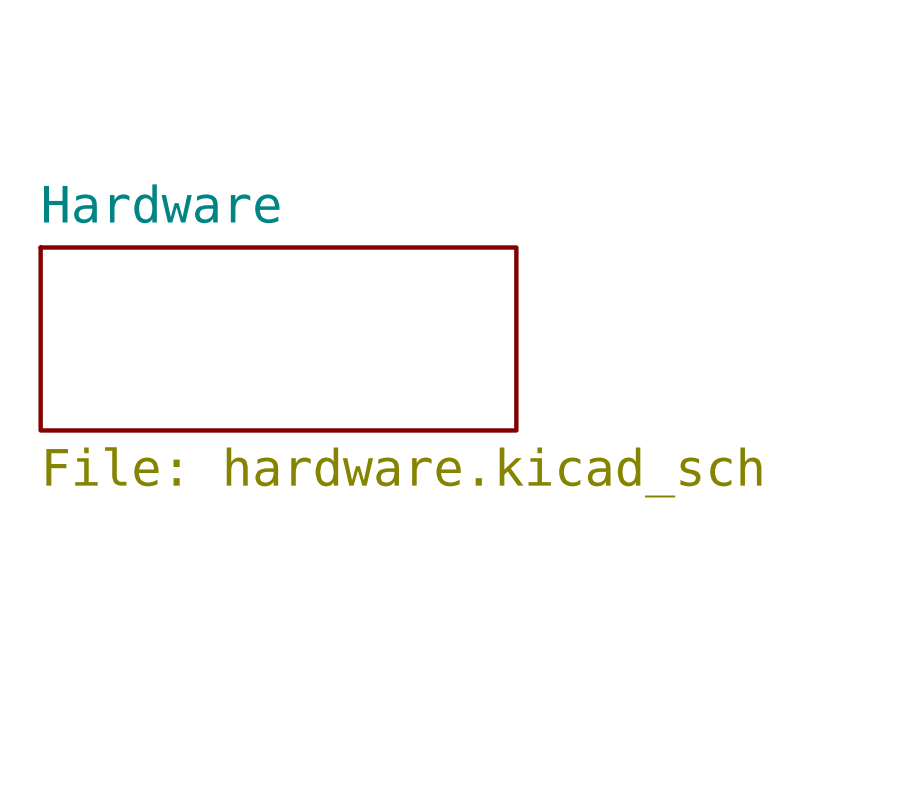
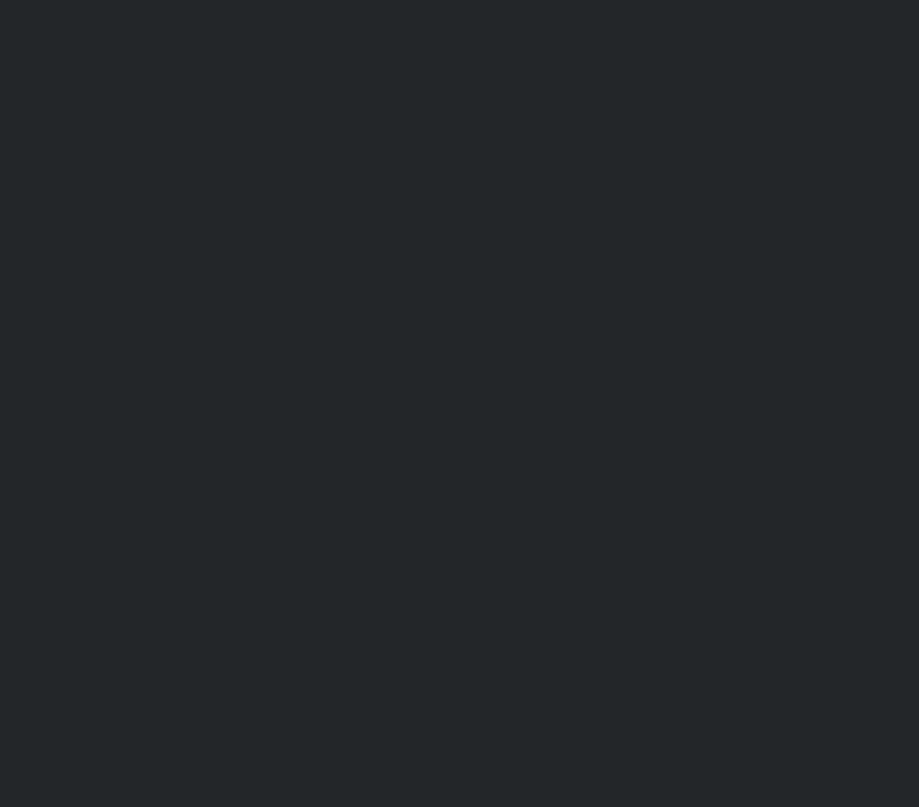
sheet Hardware: File: hardware.kicad_sch (278, 338) -> none

